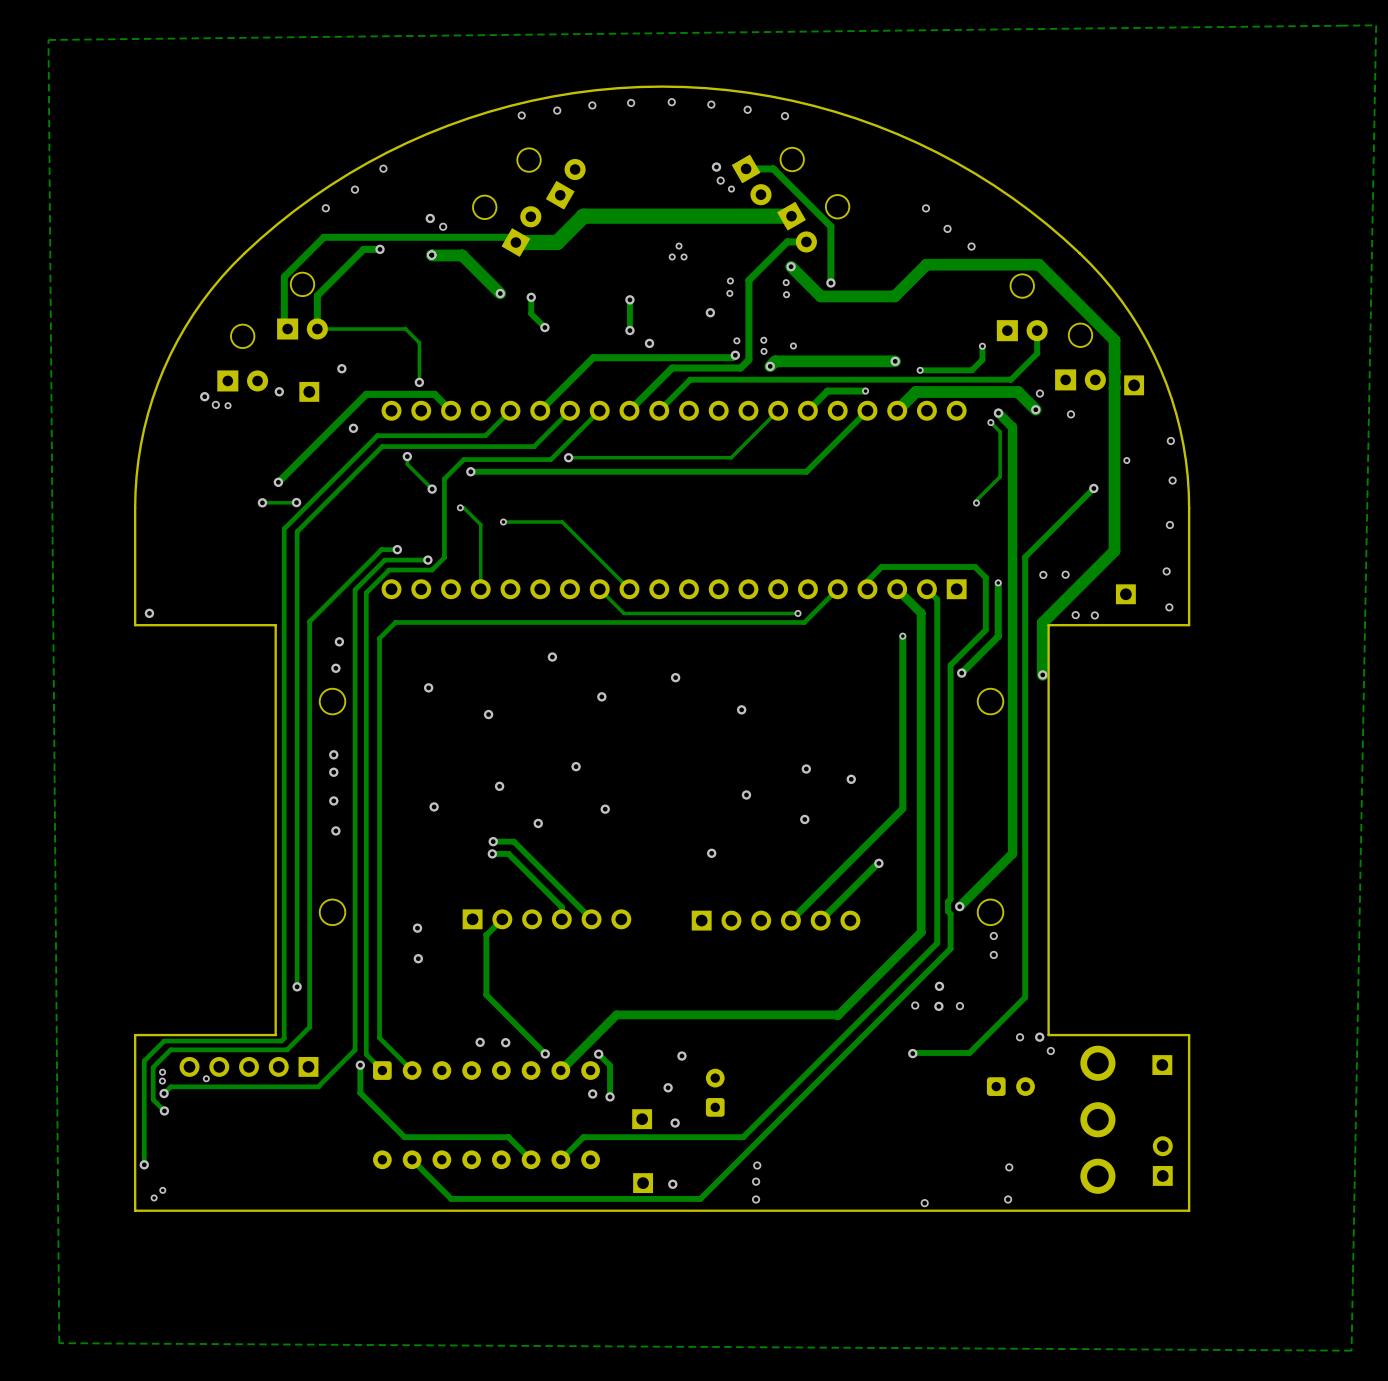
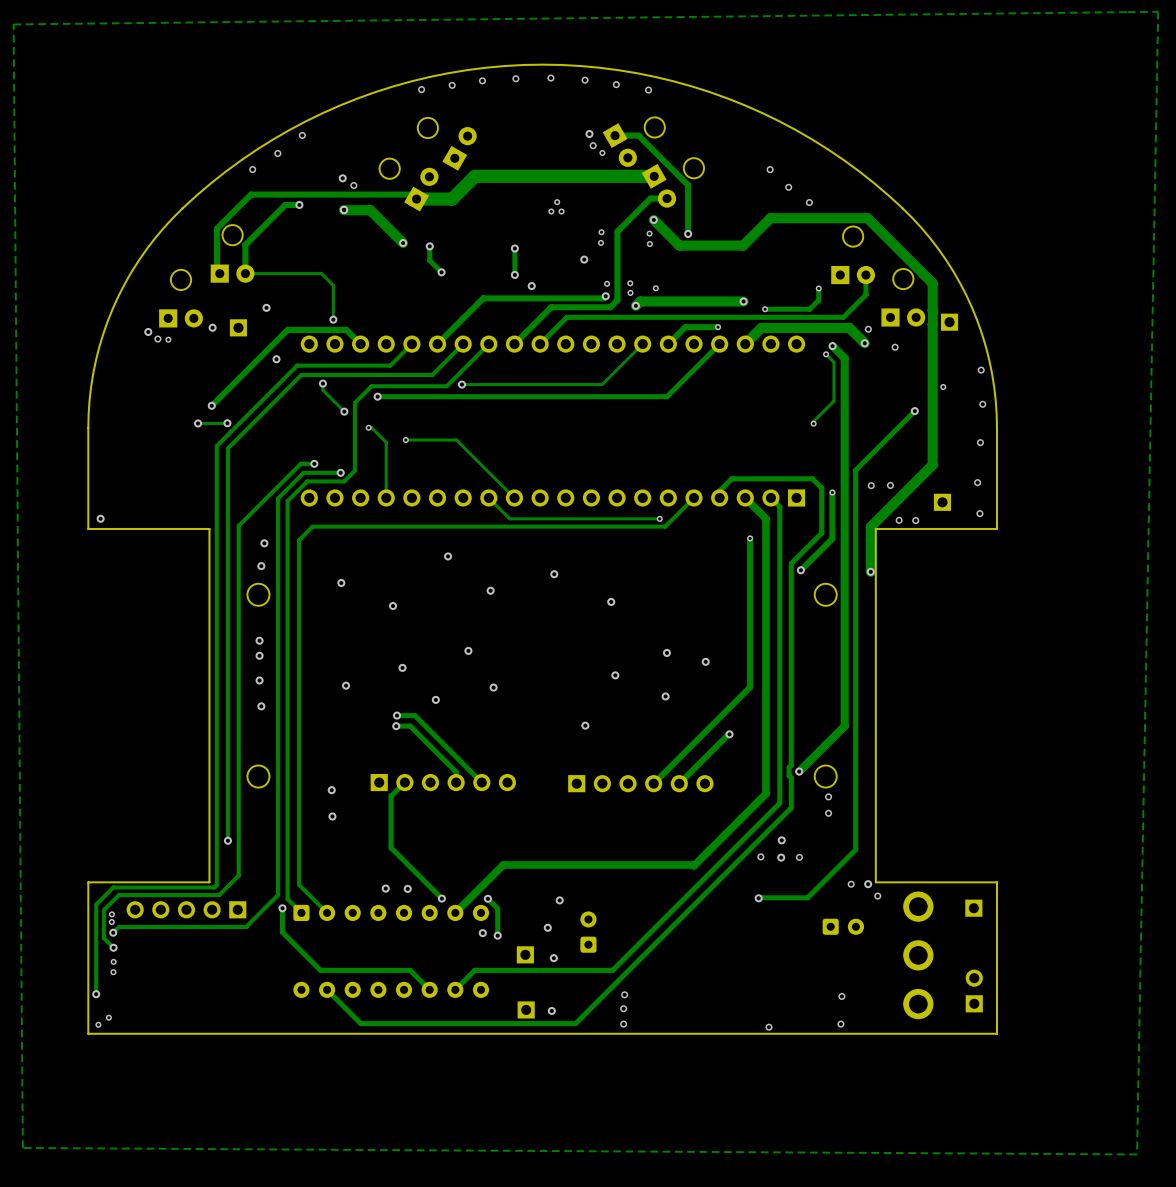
via: (206, 1078) -> none
via: none -> (113, 961)
via: none -> (113, 972)
via: (162, 1190) -> none
via: none -> (108, 1017)
via: (154, 1197) -> none
via: none -> (98, 1024)

